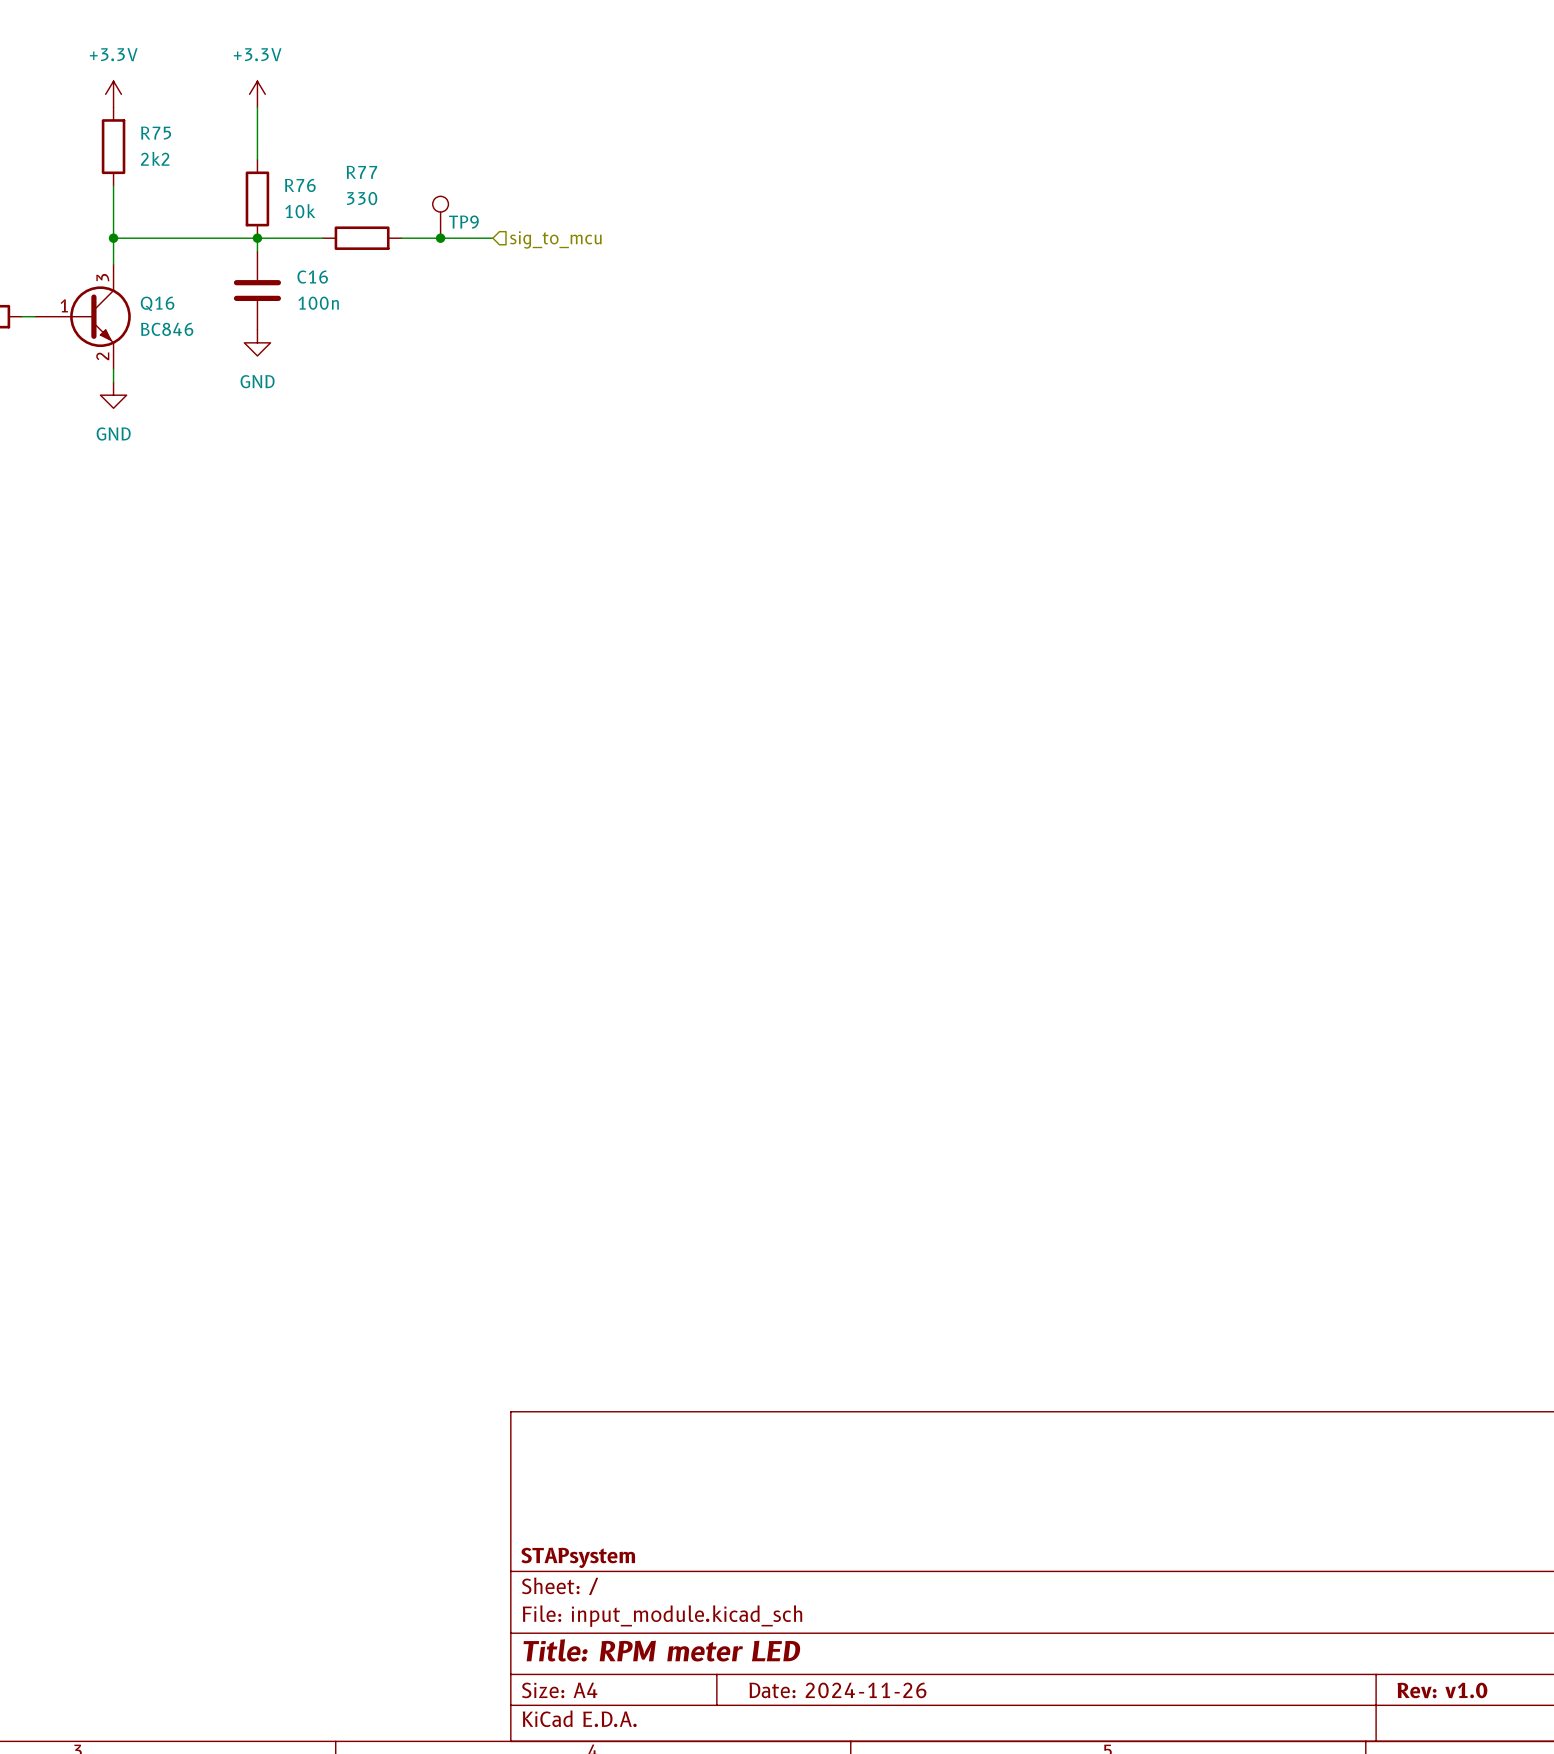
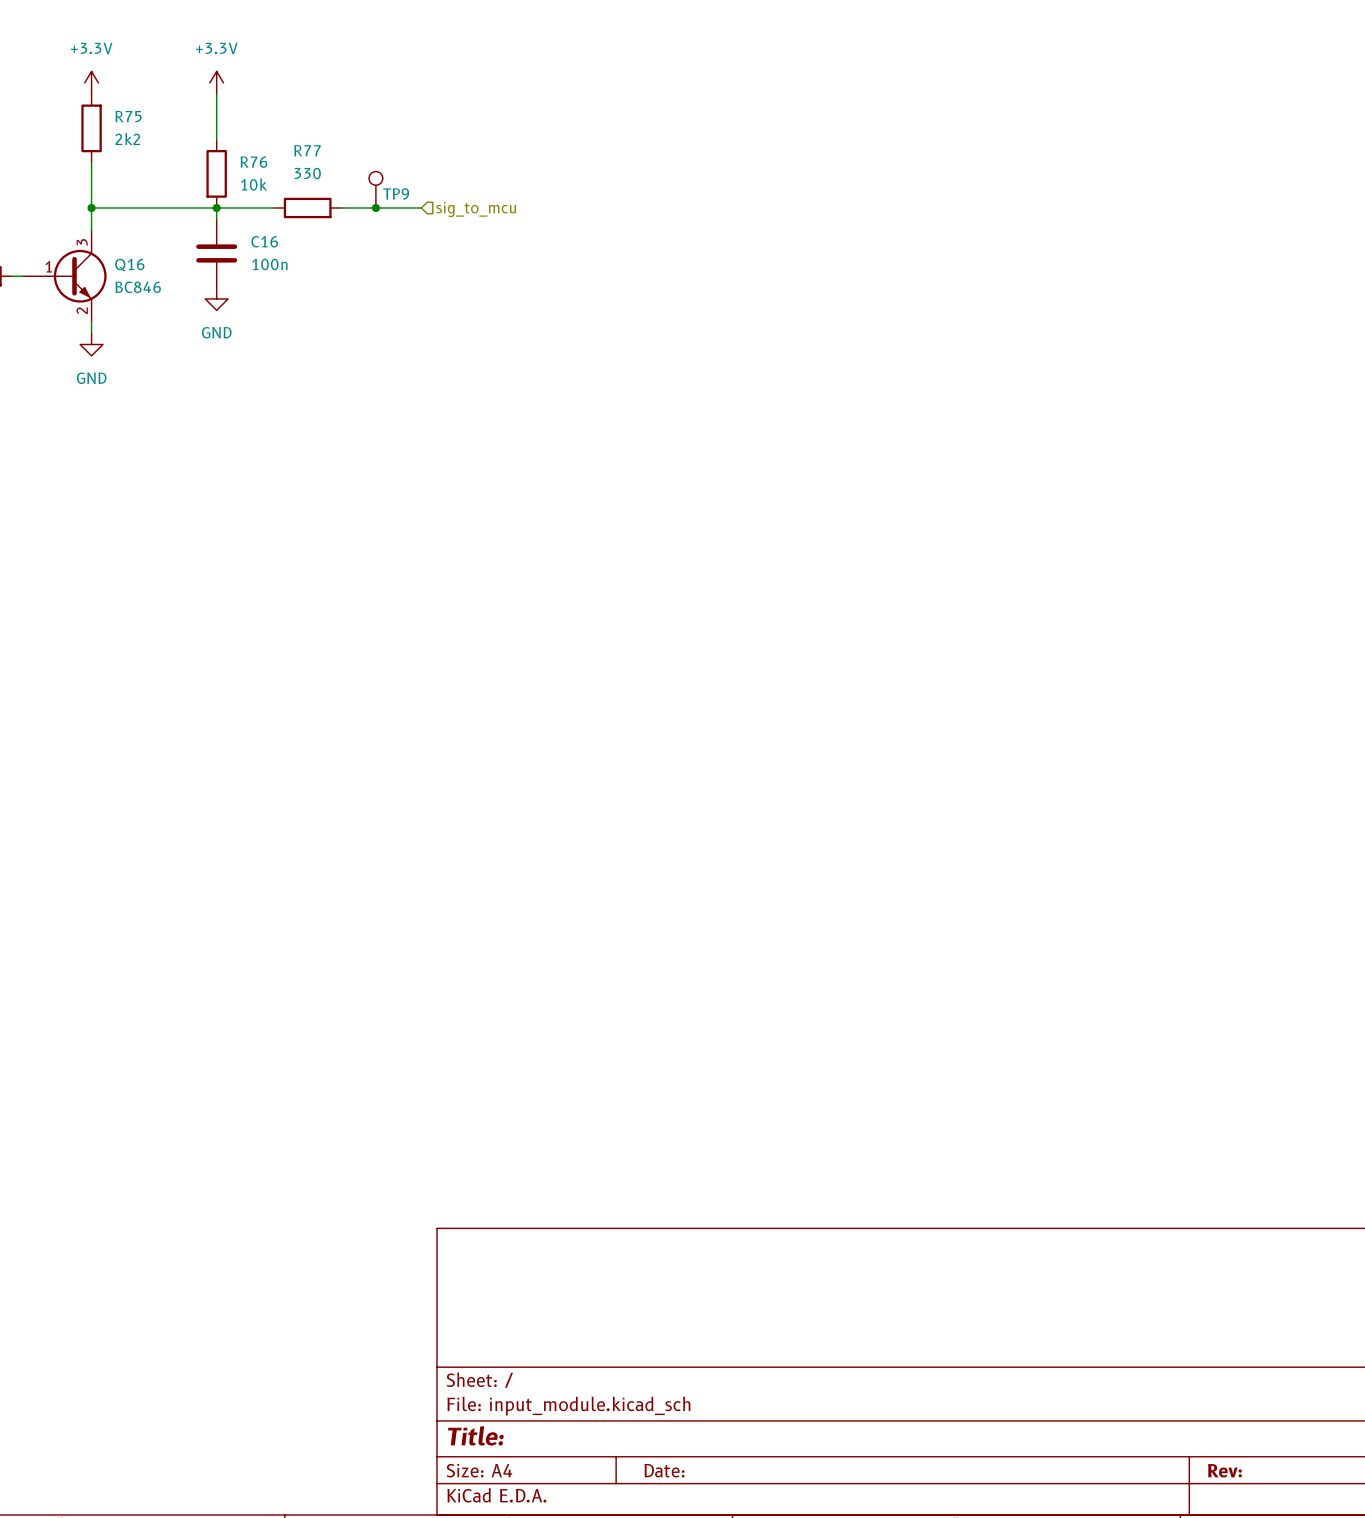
title block: STAPsystem (578, 1557) -> none
title block: Title: RPM meter LED (661, 1650) -> Title: (475, 1435)
title block: Date: 2024-11-26 (837, 1690) -> Date: (664, 1470)
title block: Rev: v1.0 (1442, 1690) -> Rev: (1224, 1470)

